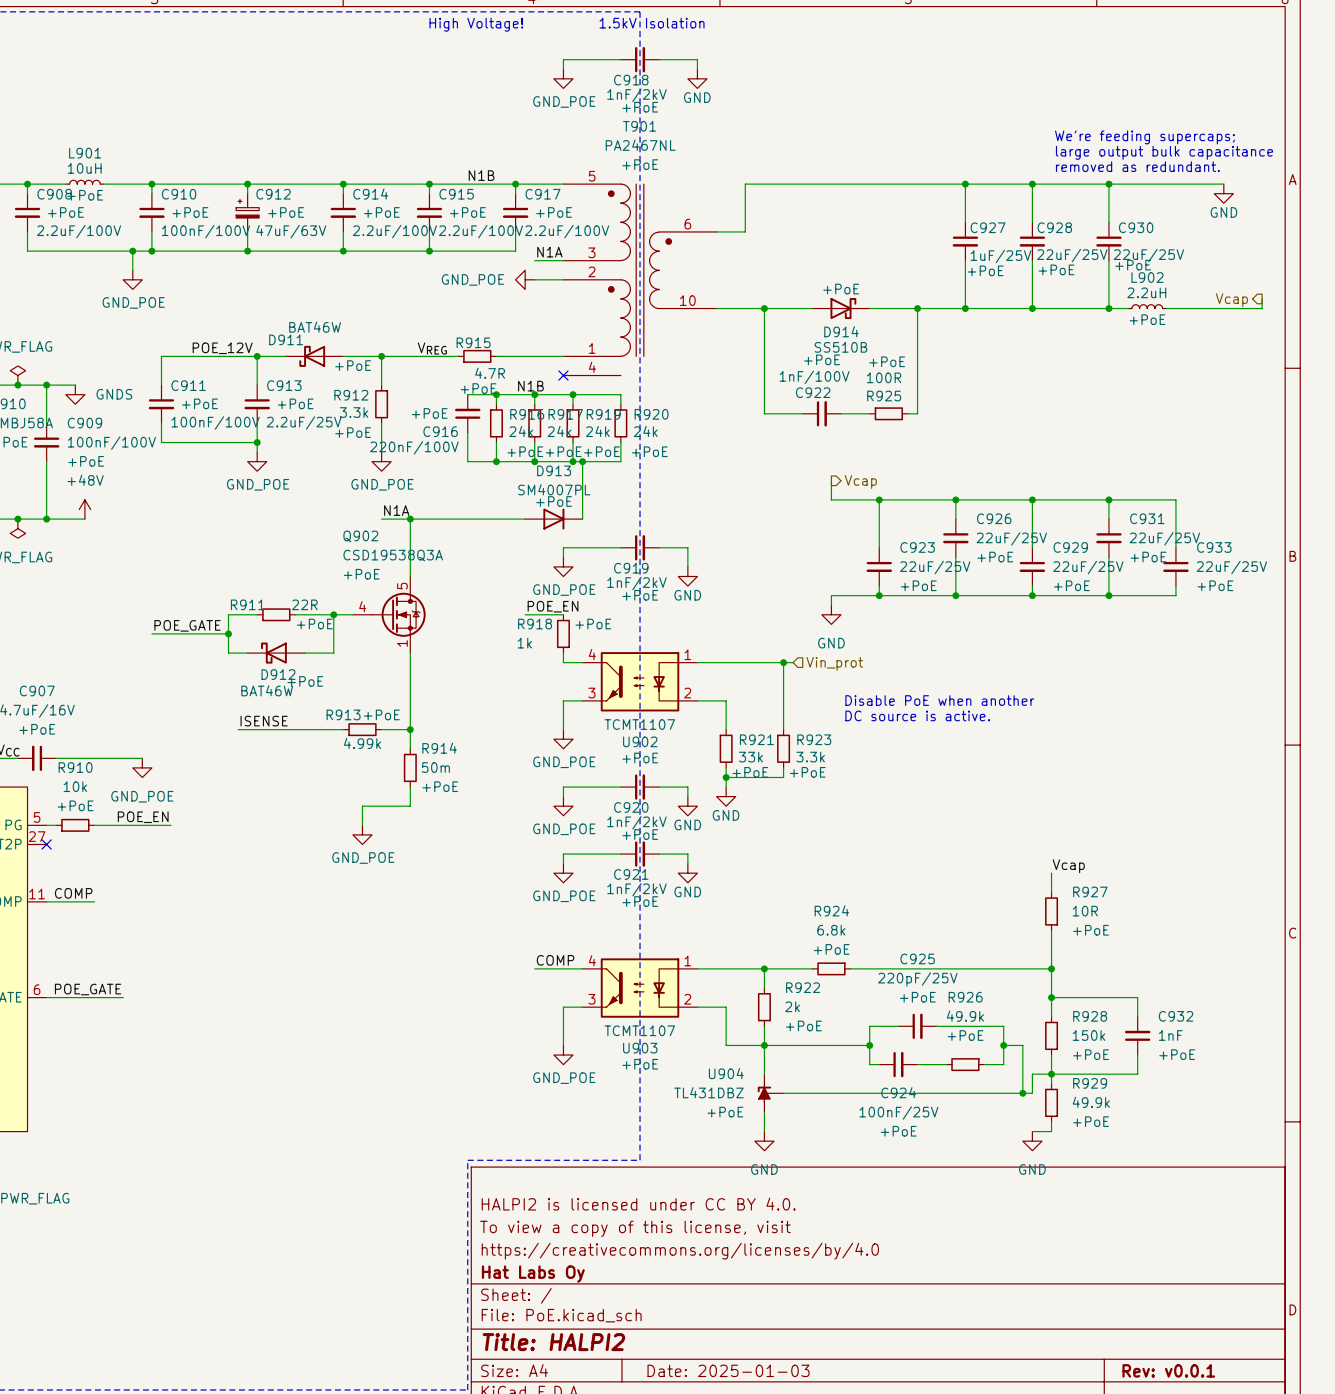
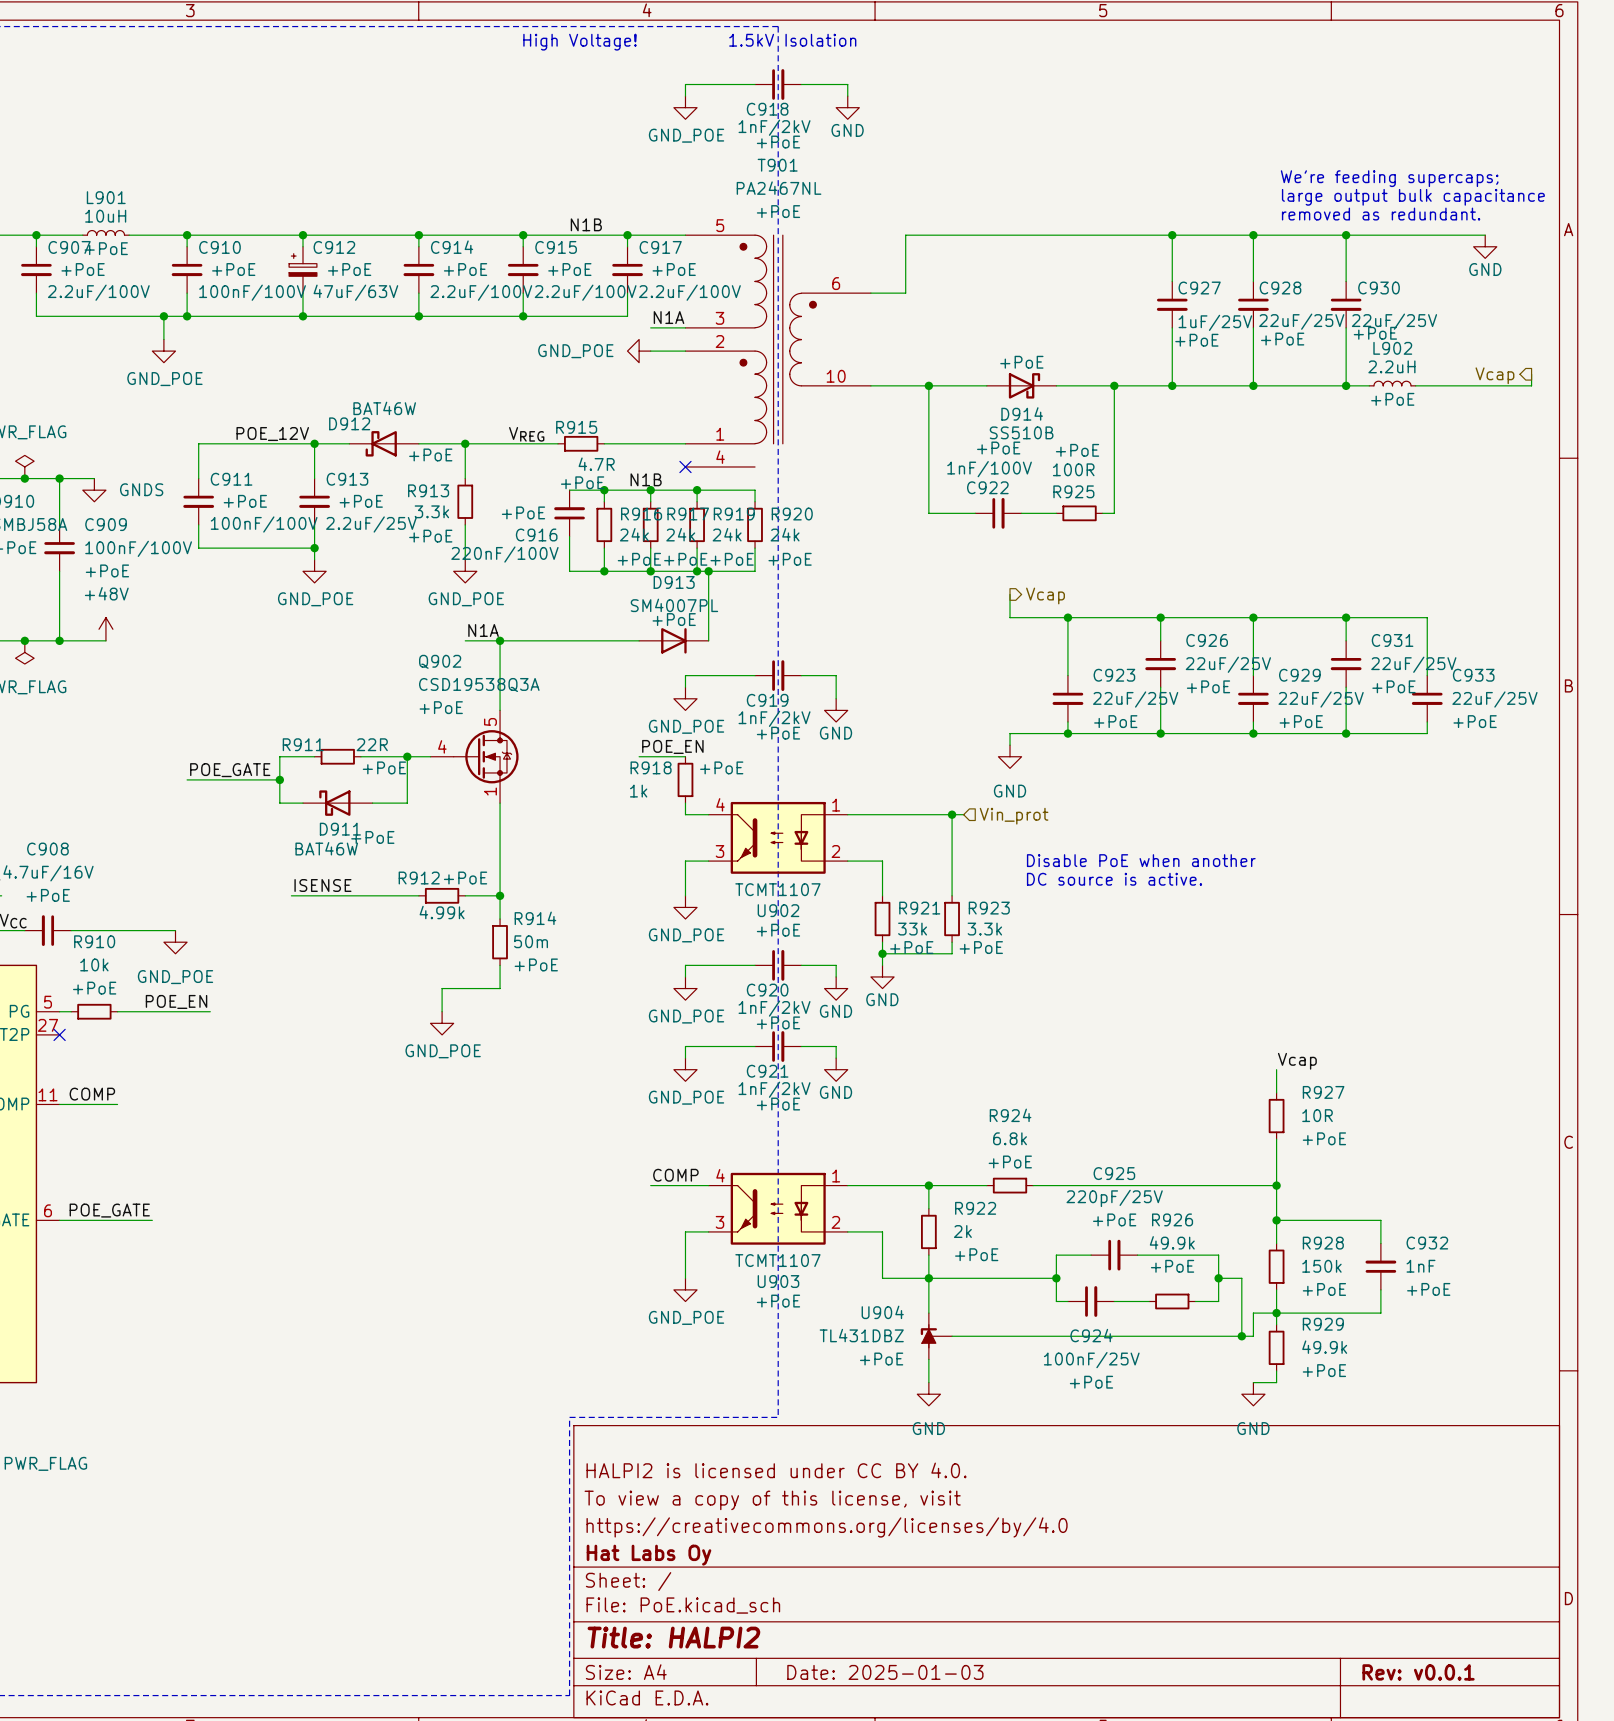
C908 name: C908 (54, 194) -> C907 (69, 247)
D911 name: D911 (286, 339) -> D912 (349, 423)
R912 name: R912 (351, 395) -> R913 (428, 490)
D912 name: D912 (278, 674) -> D911 (340, 829)
C907 name: C907 (37, 690) -> C908 (47, 849)
R913 name: R913 (343, 714) -> R912 (419, 878)

